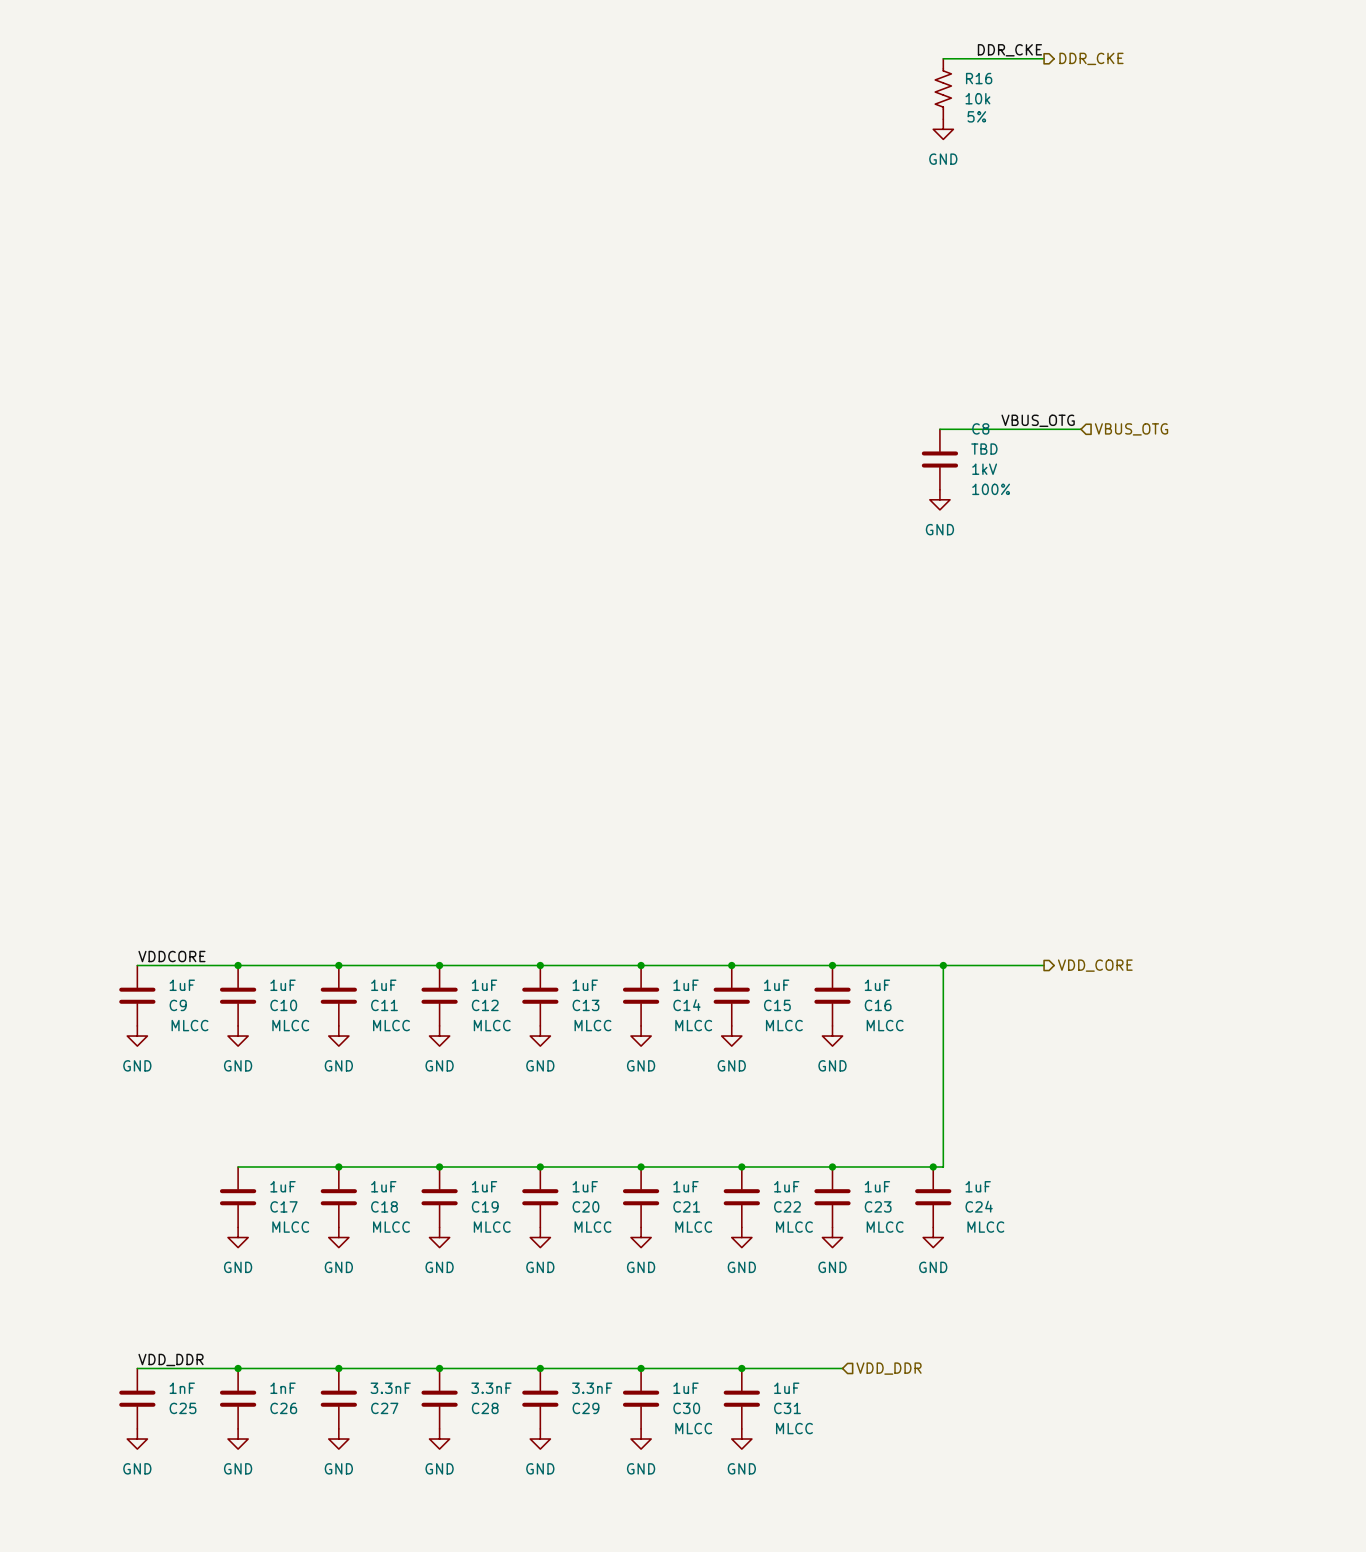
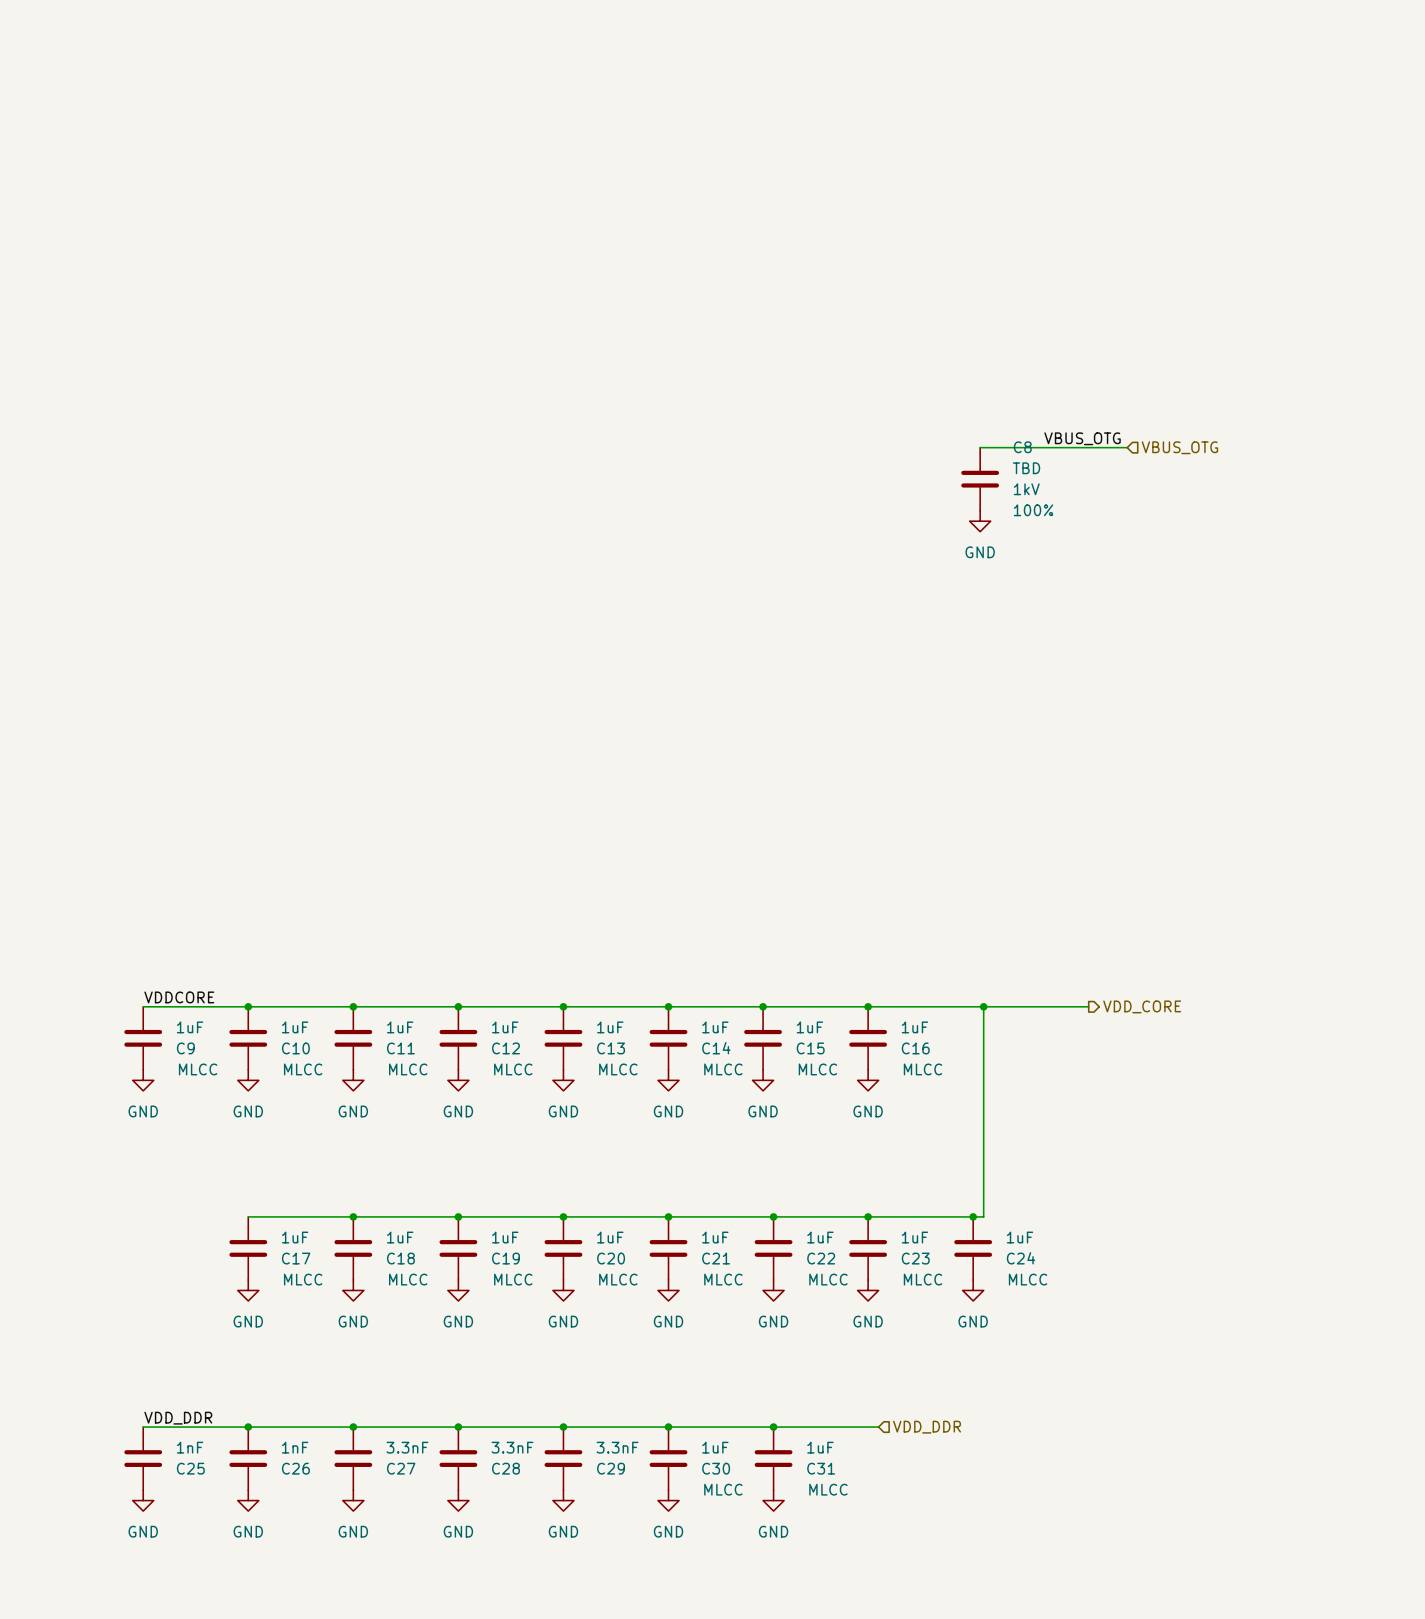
label: DDR_CKE (1009, 50) -> none
wire: (943, 58) (1044, 58) -> none
hierarchical label: DDR_CKE (1091, 58) -> none
R16: 10k (943, 89) -> none
power symbol: GND (943, 129) -> none

